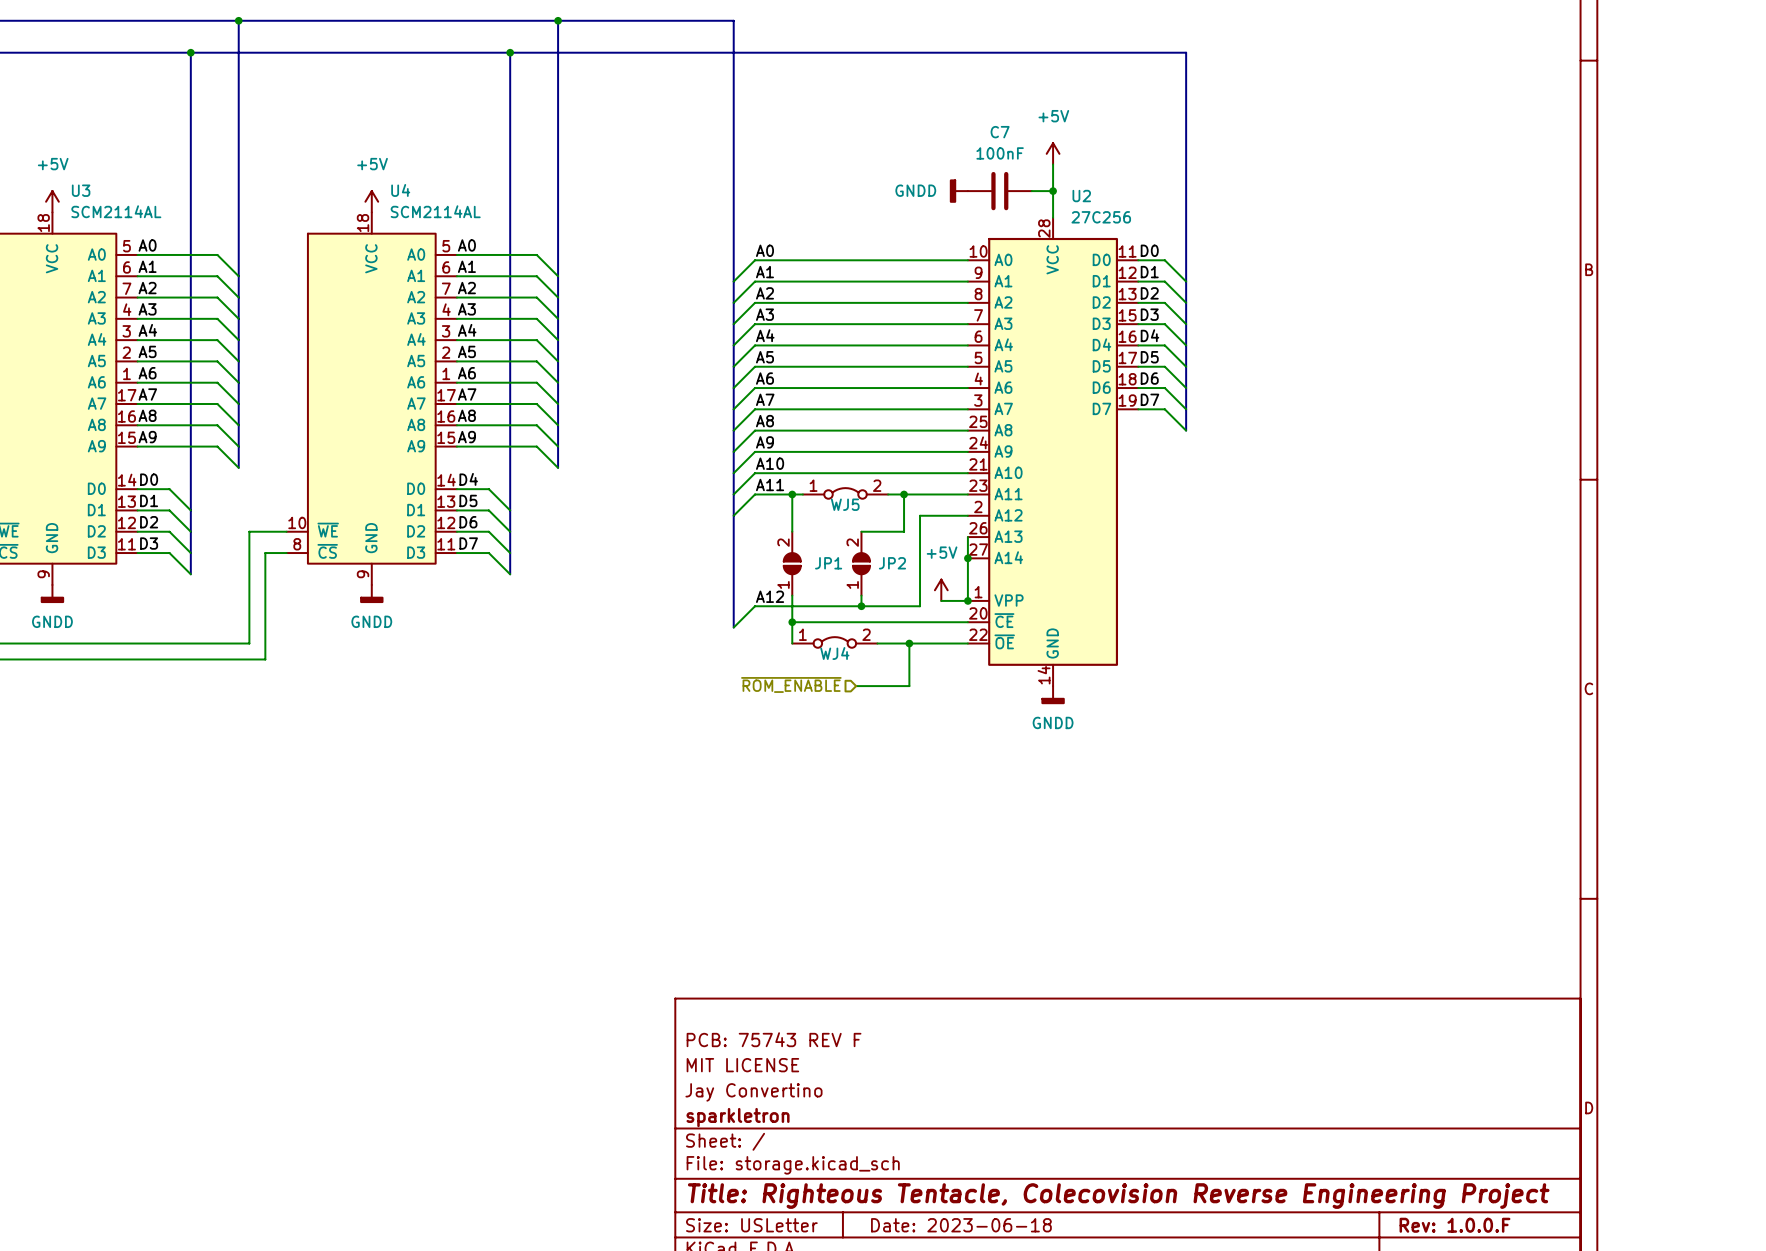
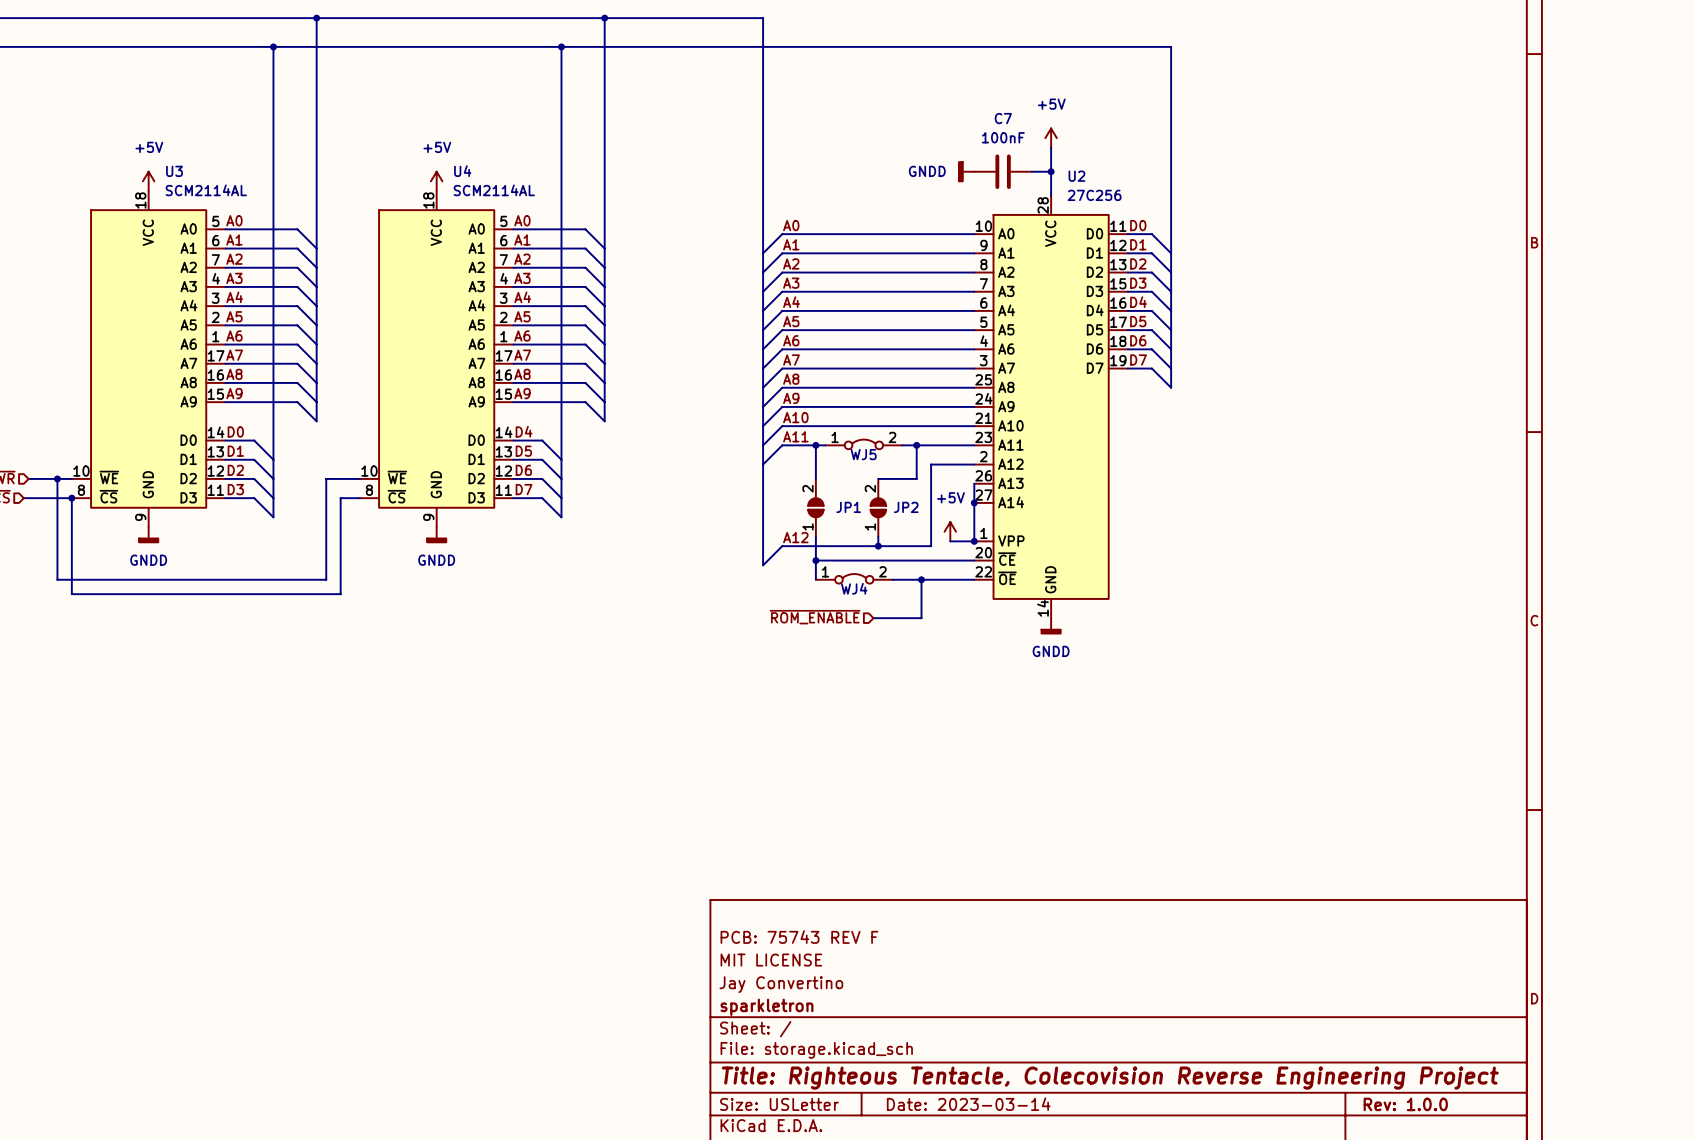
title block: Date: 2023-06-18 (961, 1225) -> Date: 2023-03-14 (968, 1104)
title block: Rev: 1.0.0.F (1454, 1225) -> Rev: 1.0.0 (1405, 1104)

